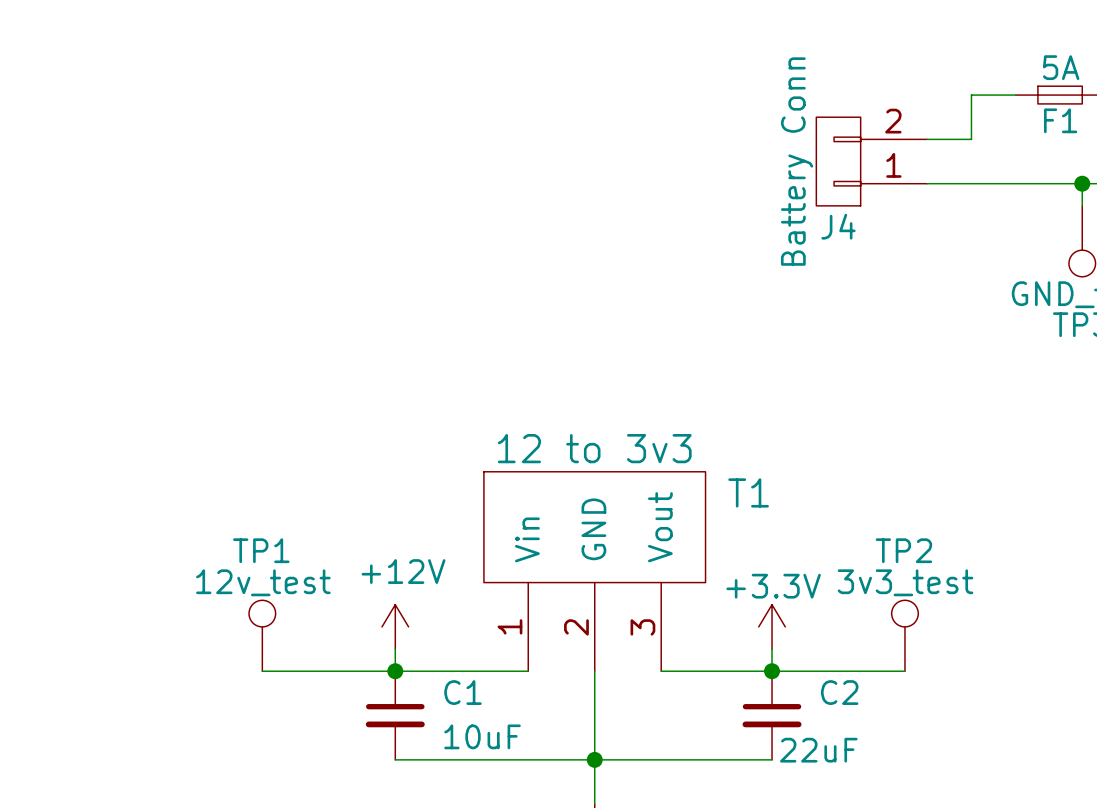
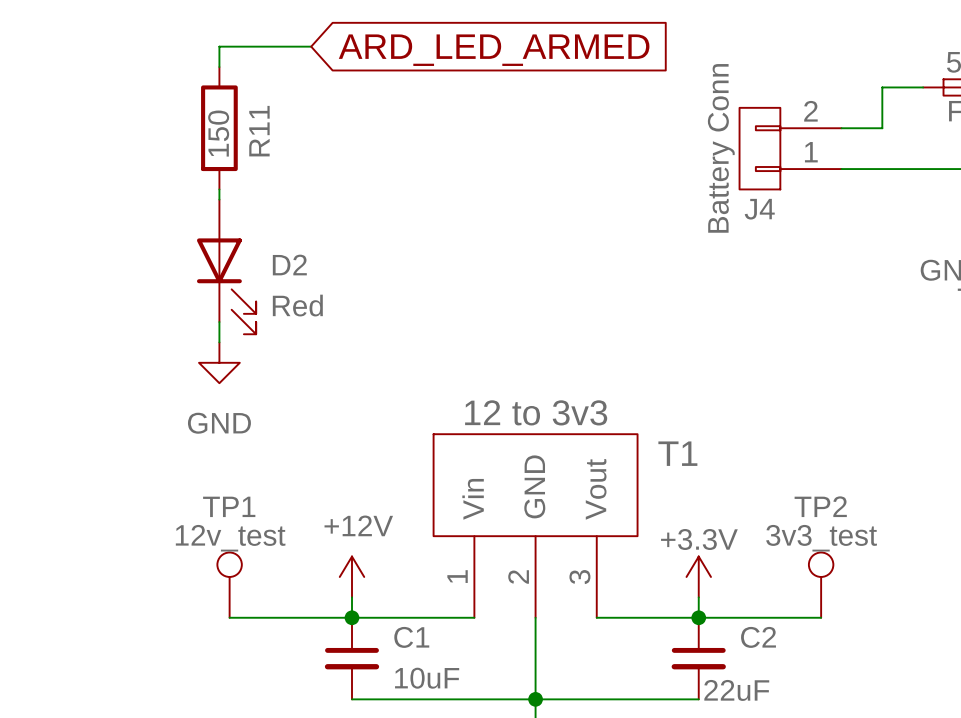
wire: none -> (311, 46) (219, 46) (219, 67)
global label: none -> ARD_LED_ARMED (494, 50)
R11: none -> 150 (219, 128)
wire: none -> (219, 189) (219, 199)
D2: none -> Red (226, 266)
wire: none -> (219, 322) (219, 342)
power symbol: none -> GND (219, 362)

